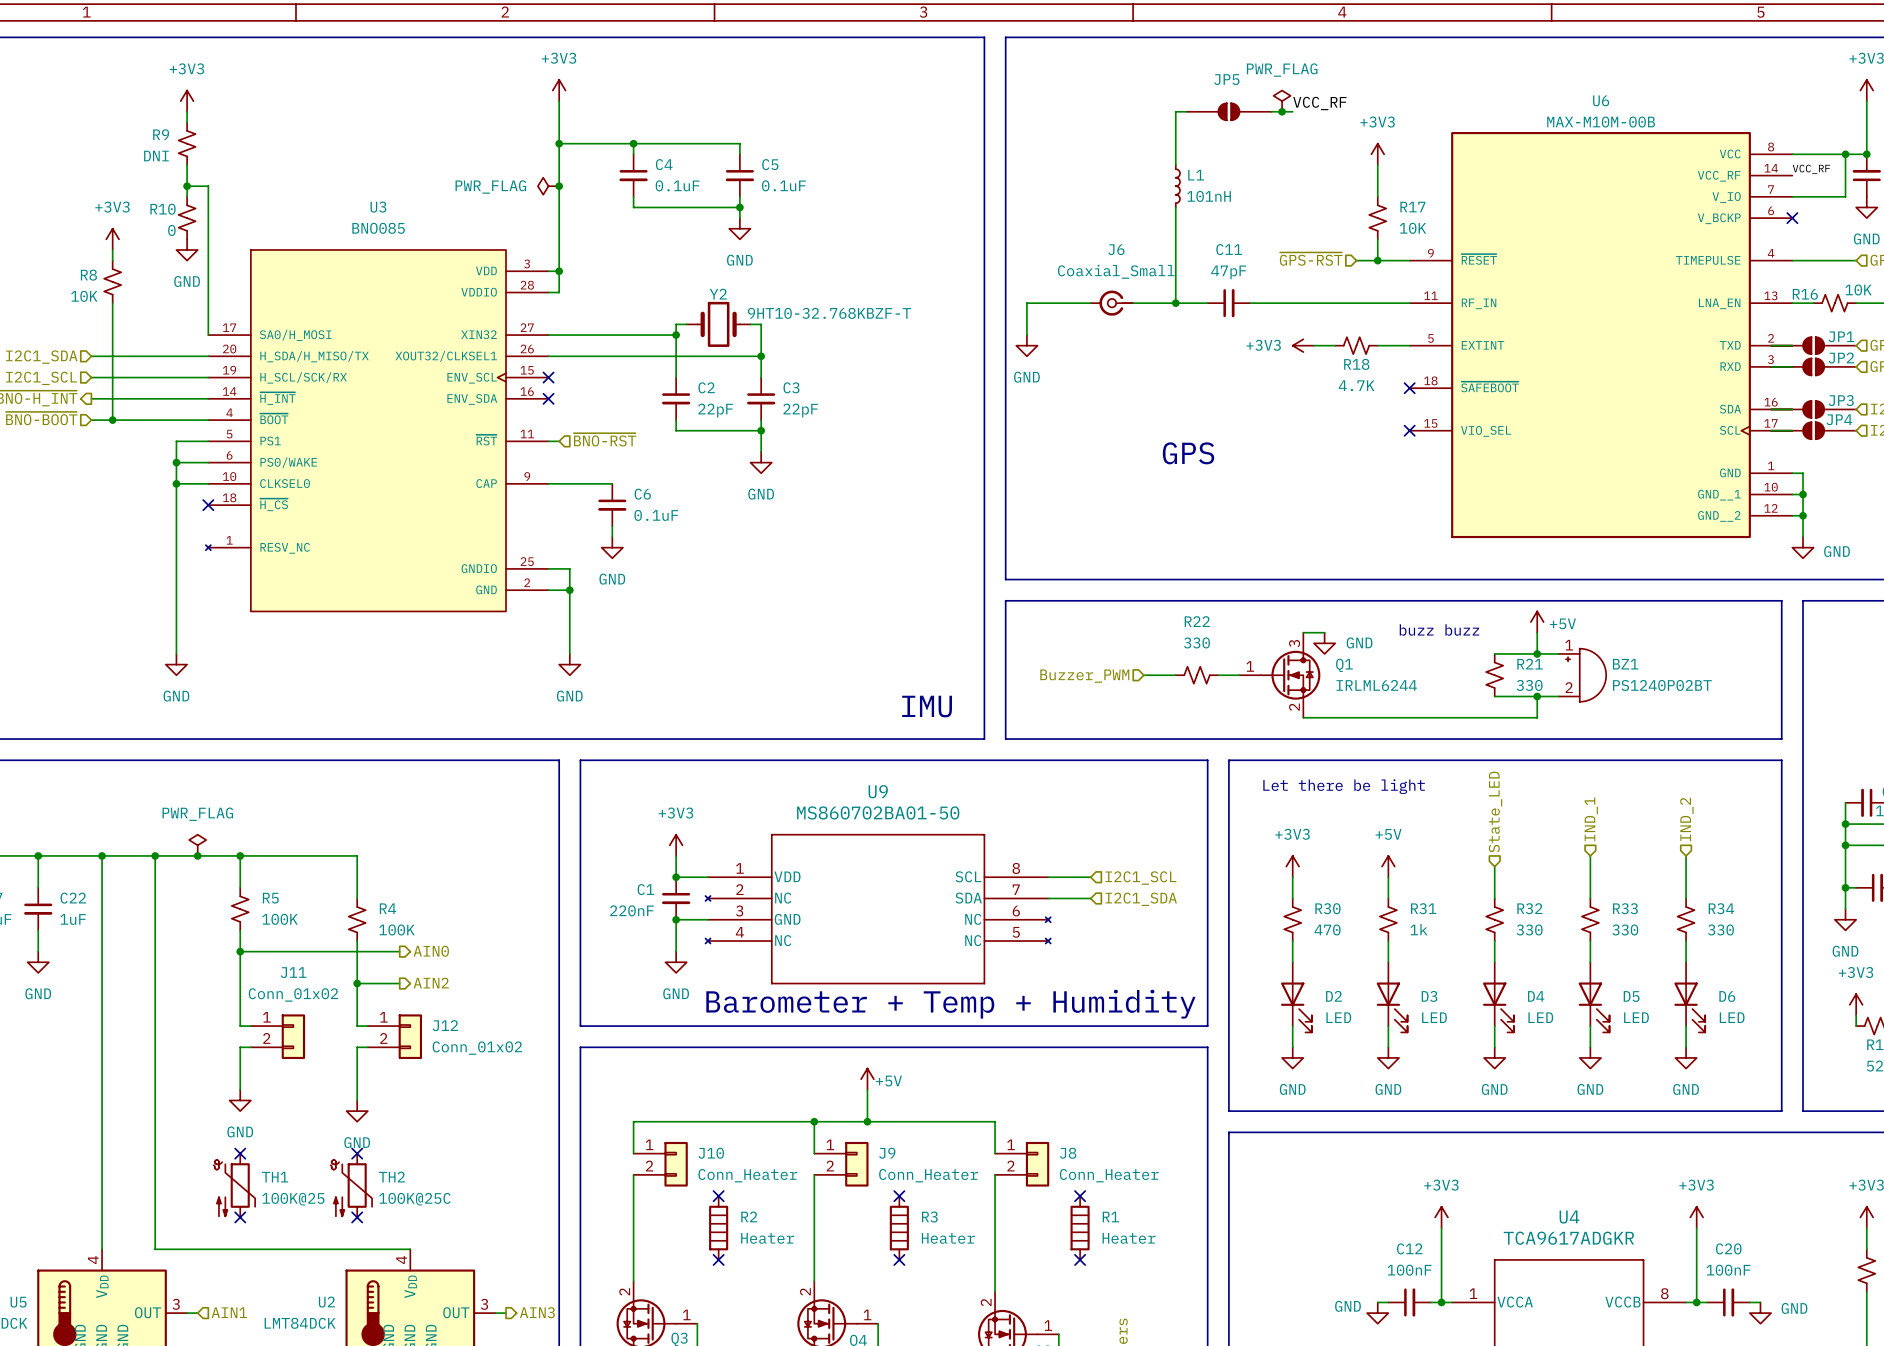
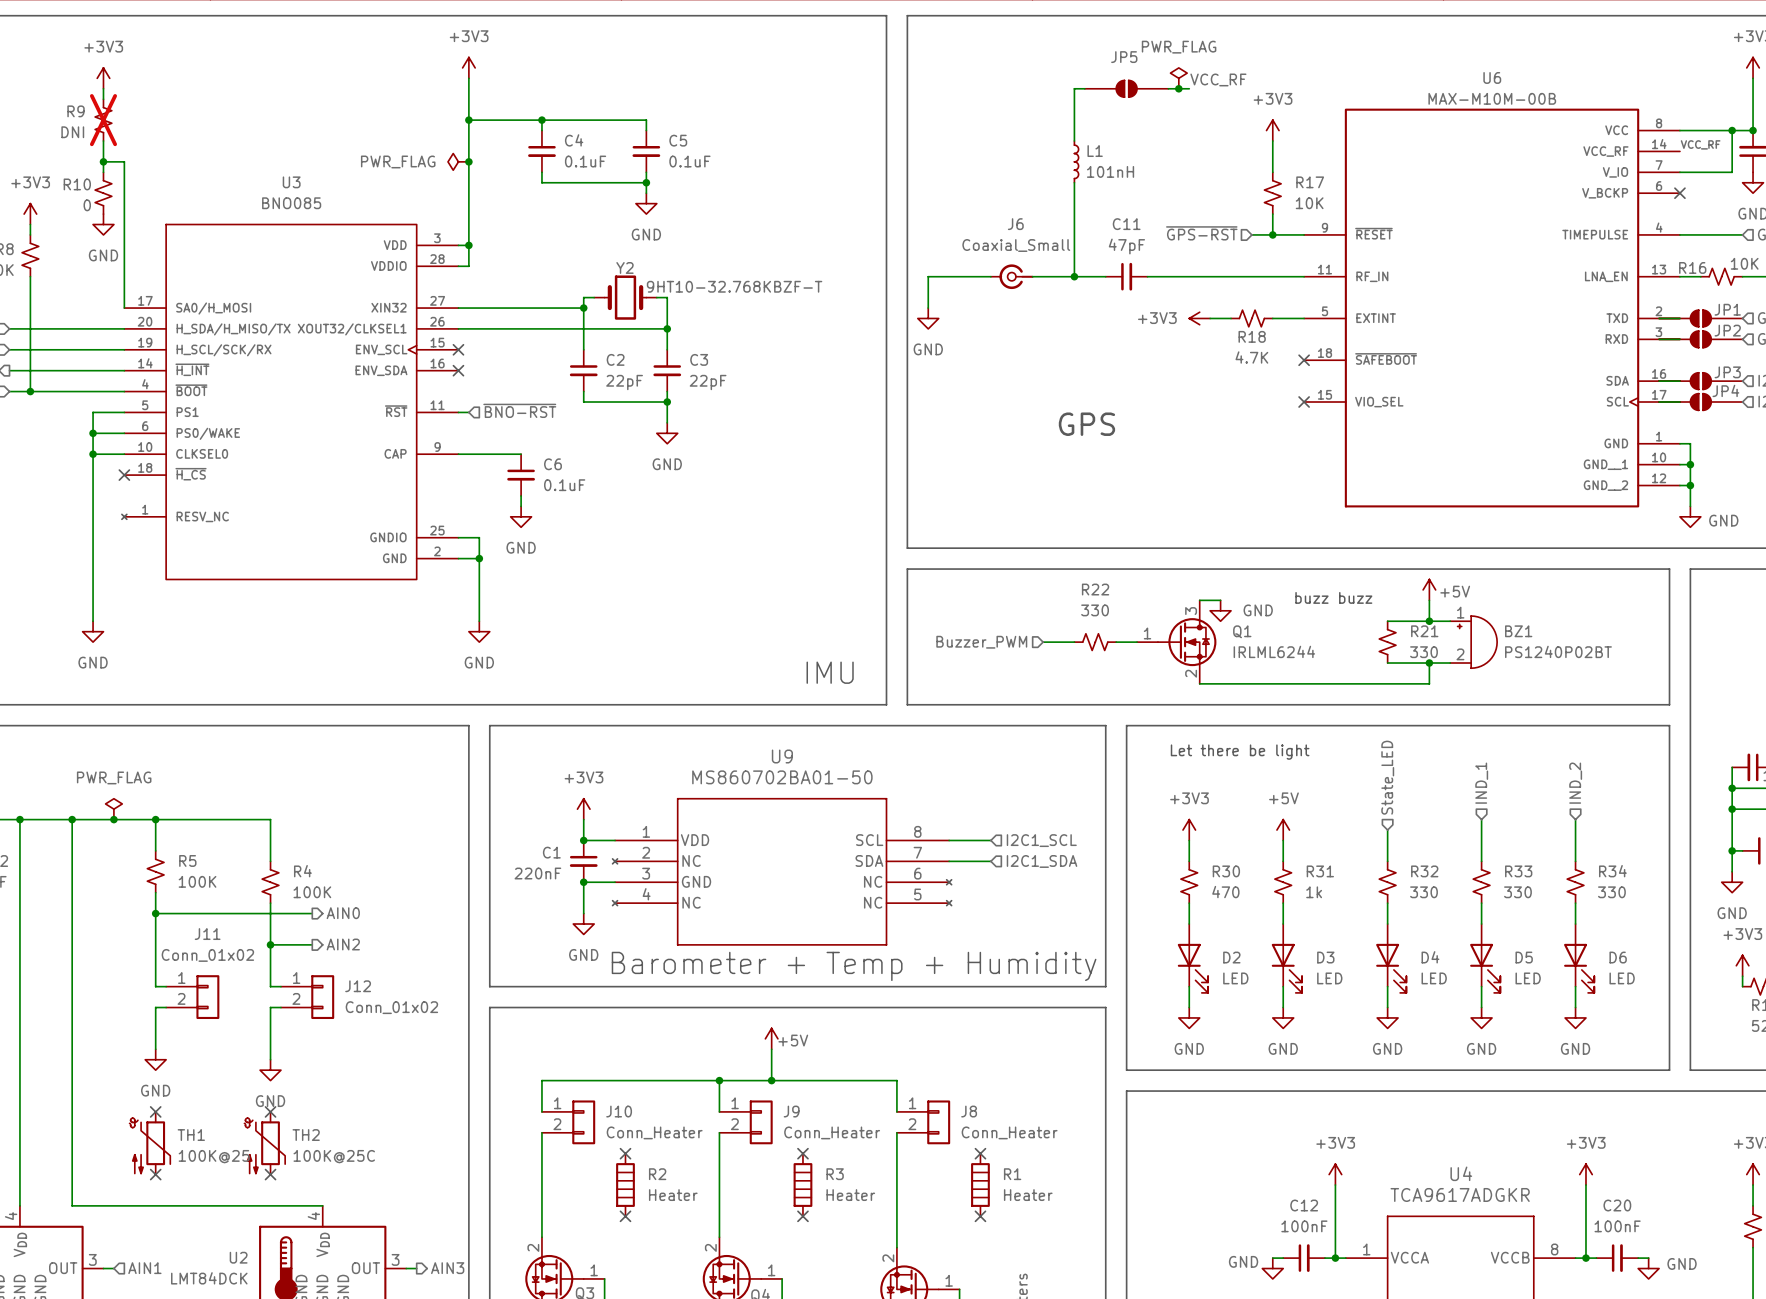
R9 do-not-place cross: none -> (103, 120)

